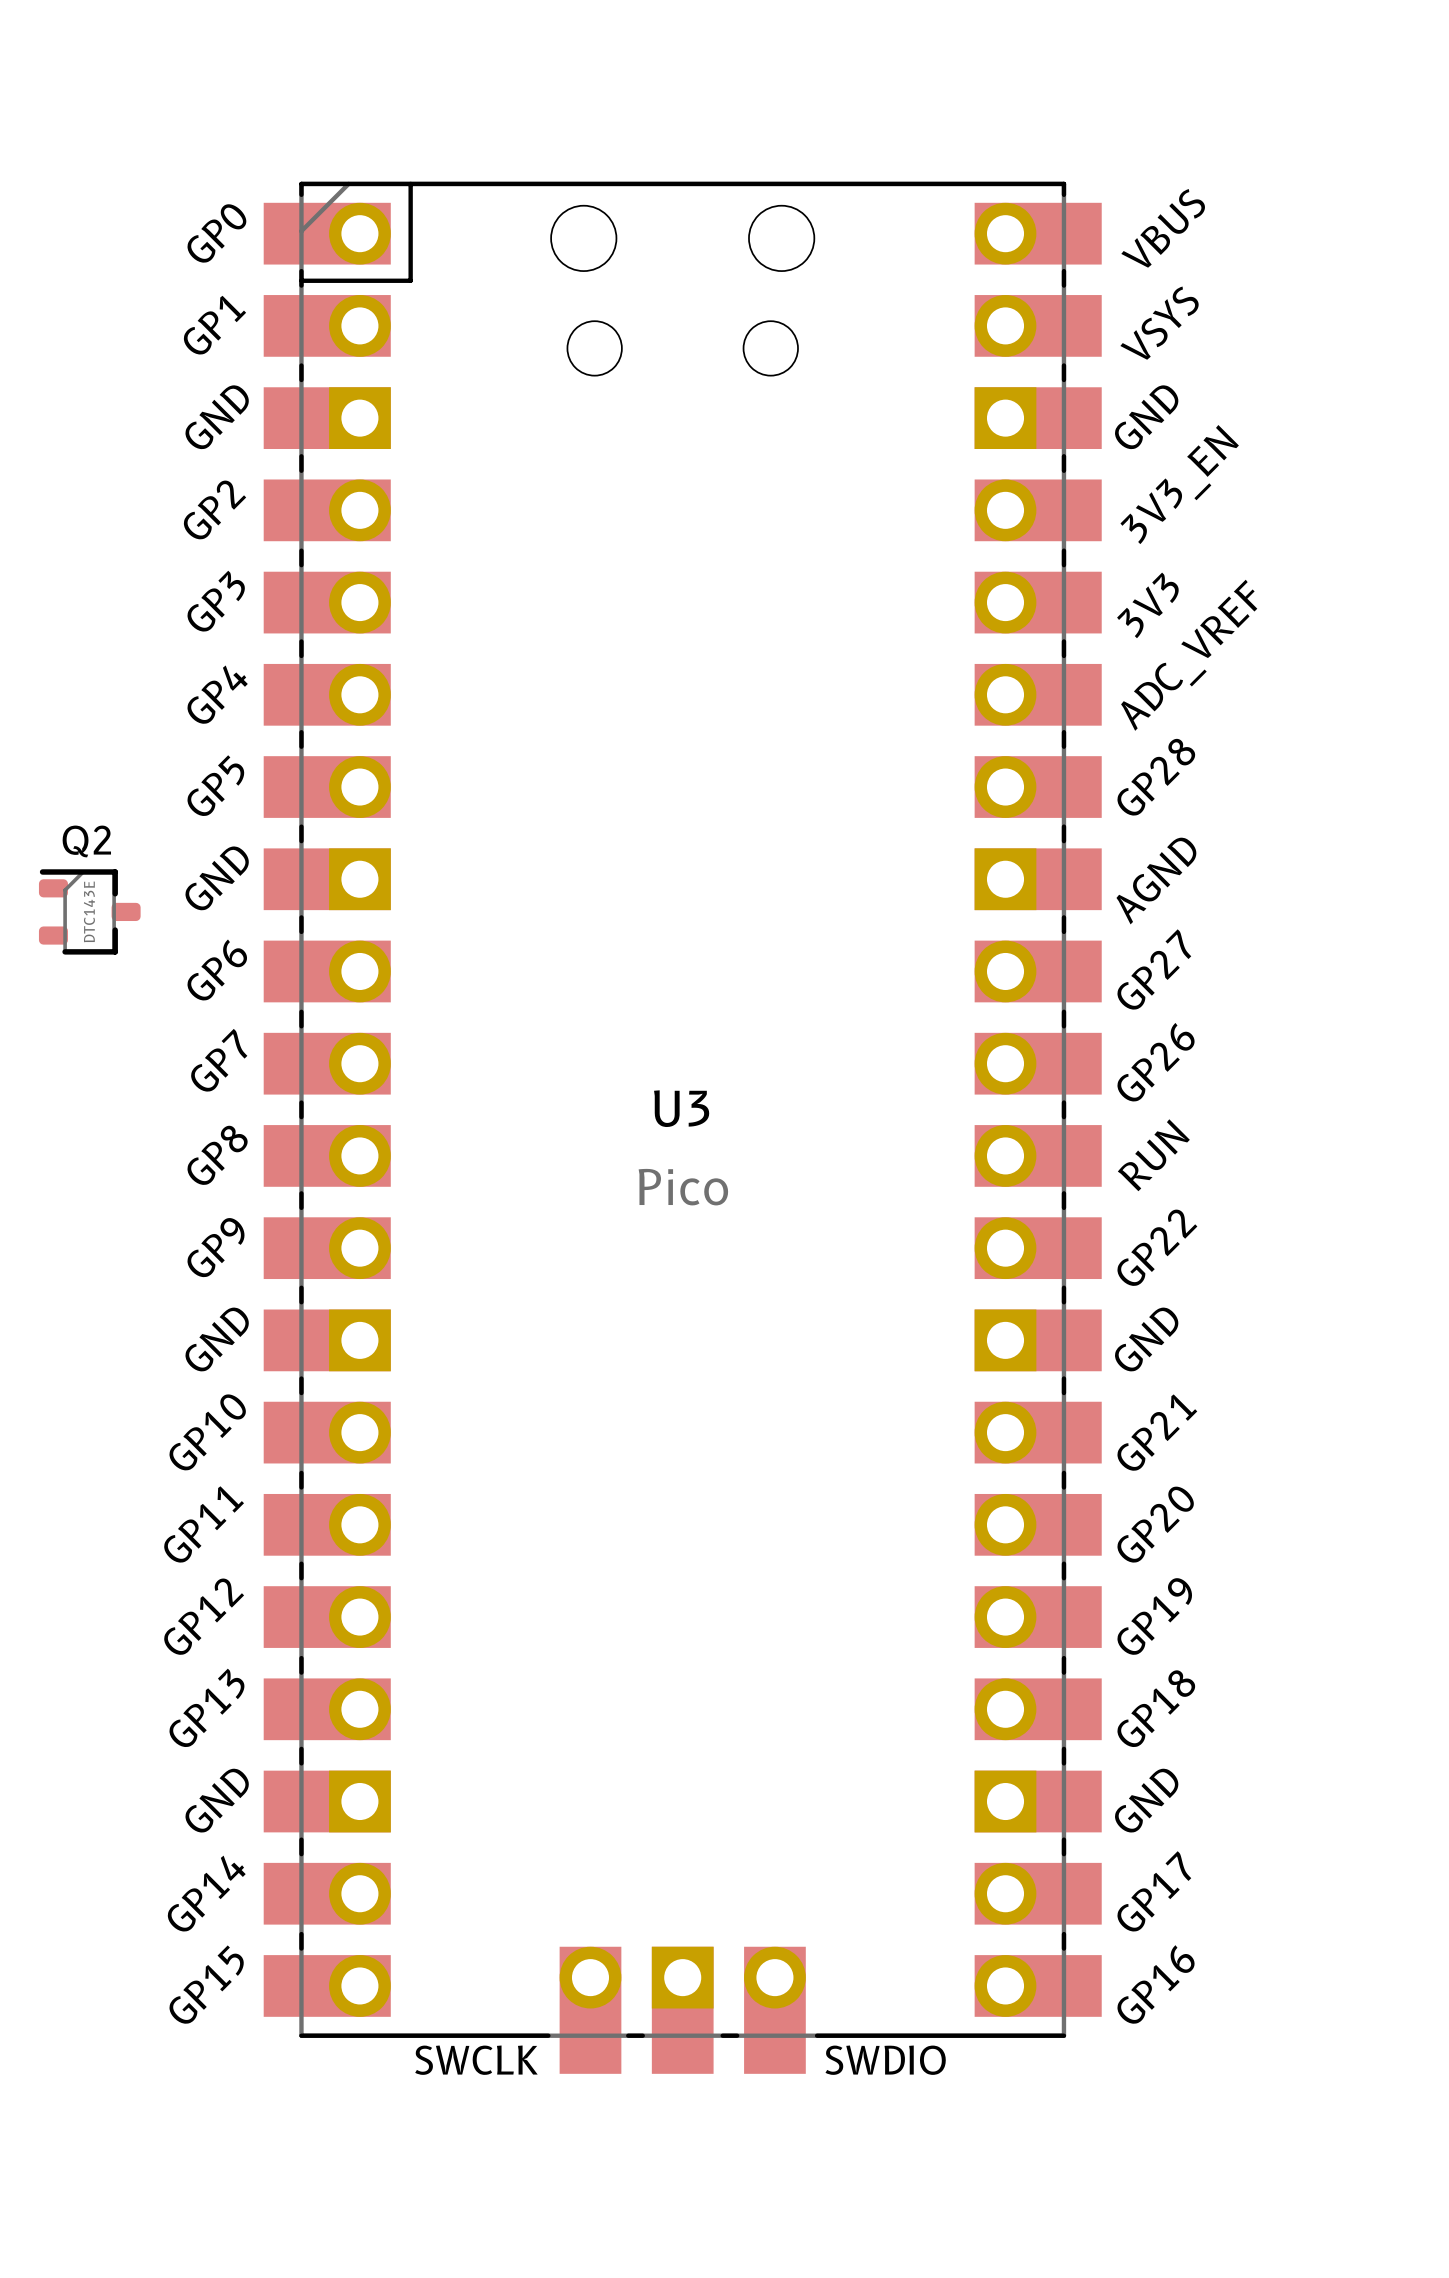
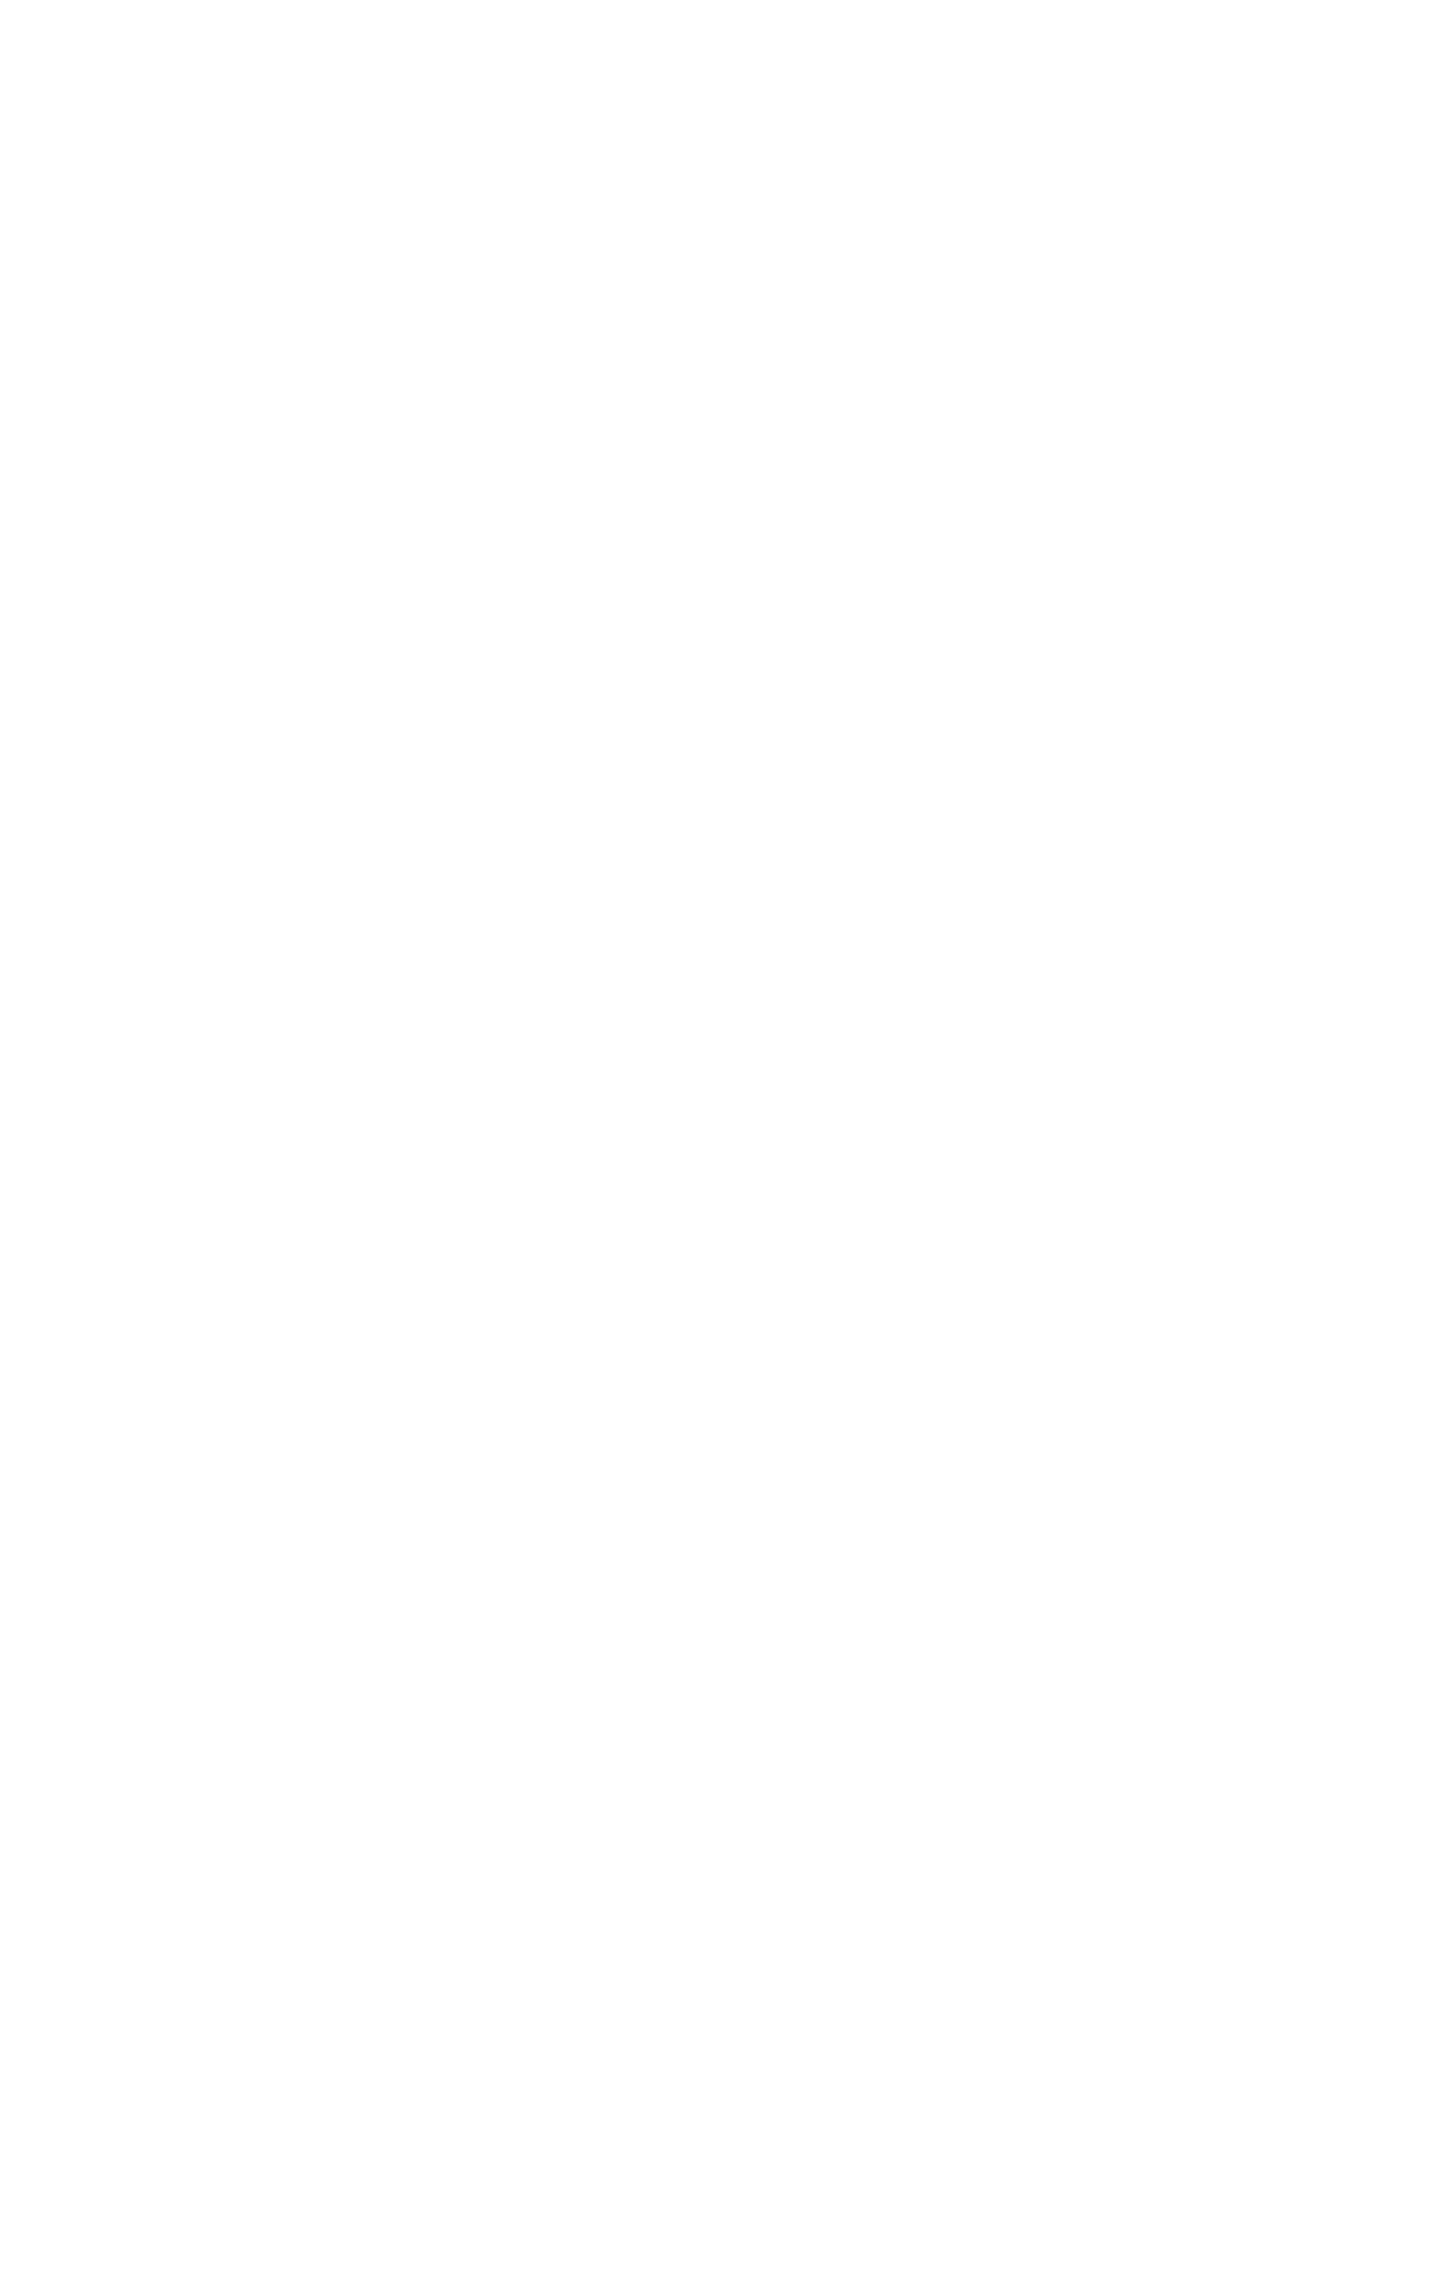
Q2: DTC143E (89, 911) -> none
U3: Pico (682, 1127) -> none

